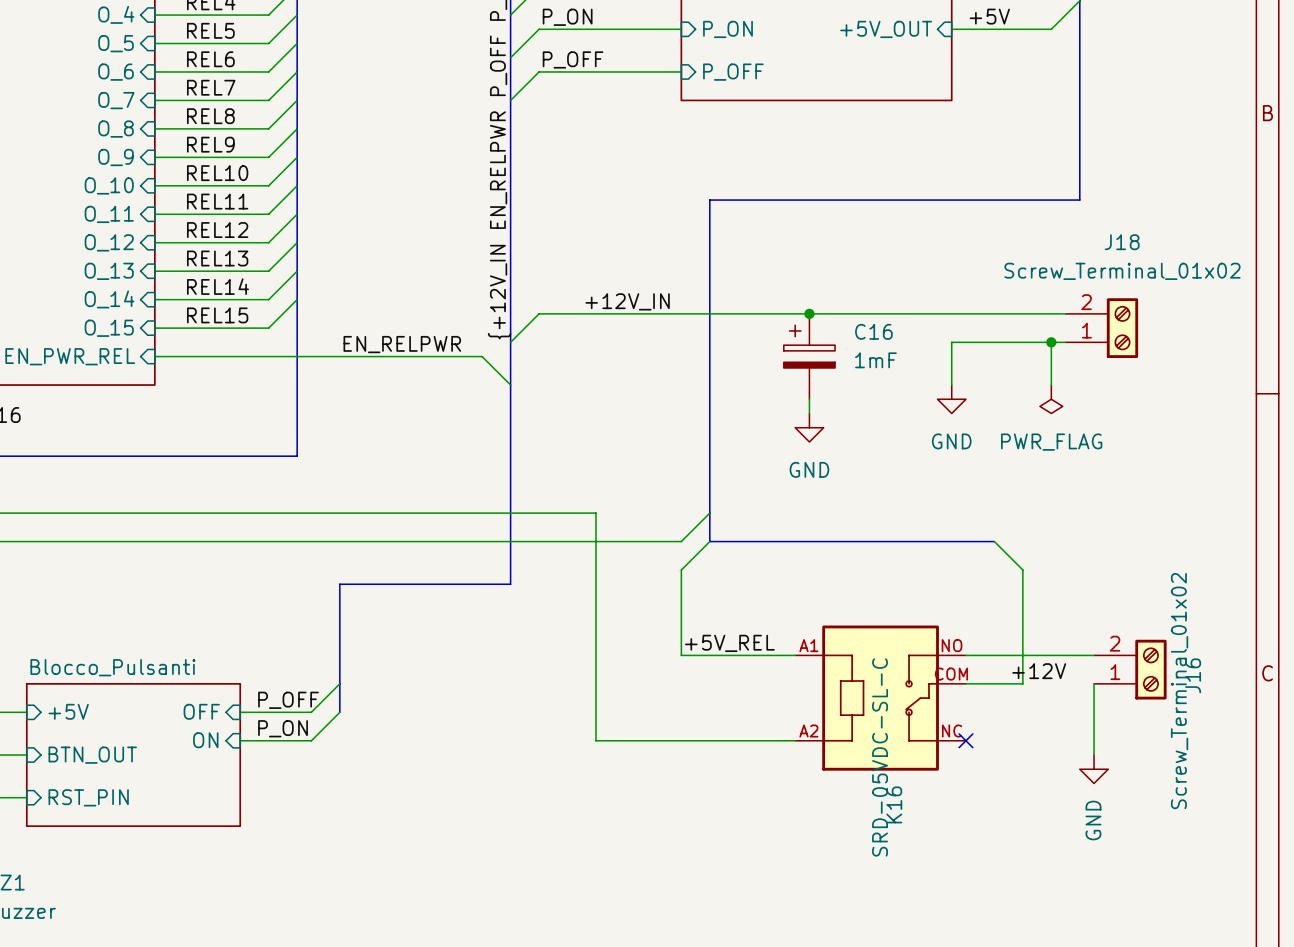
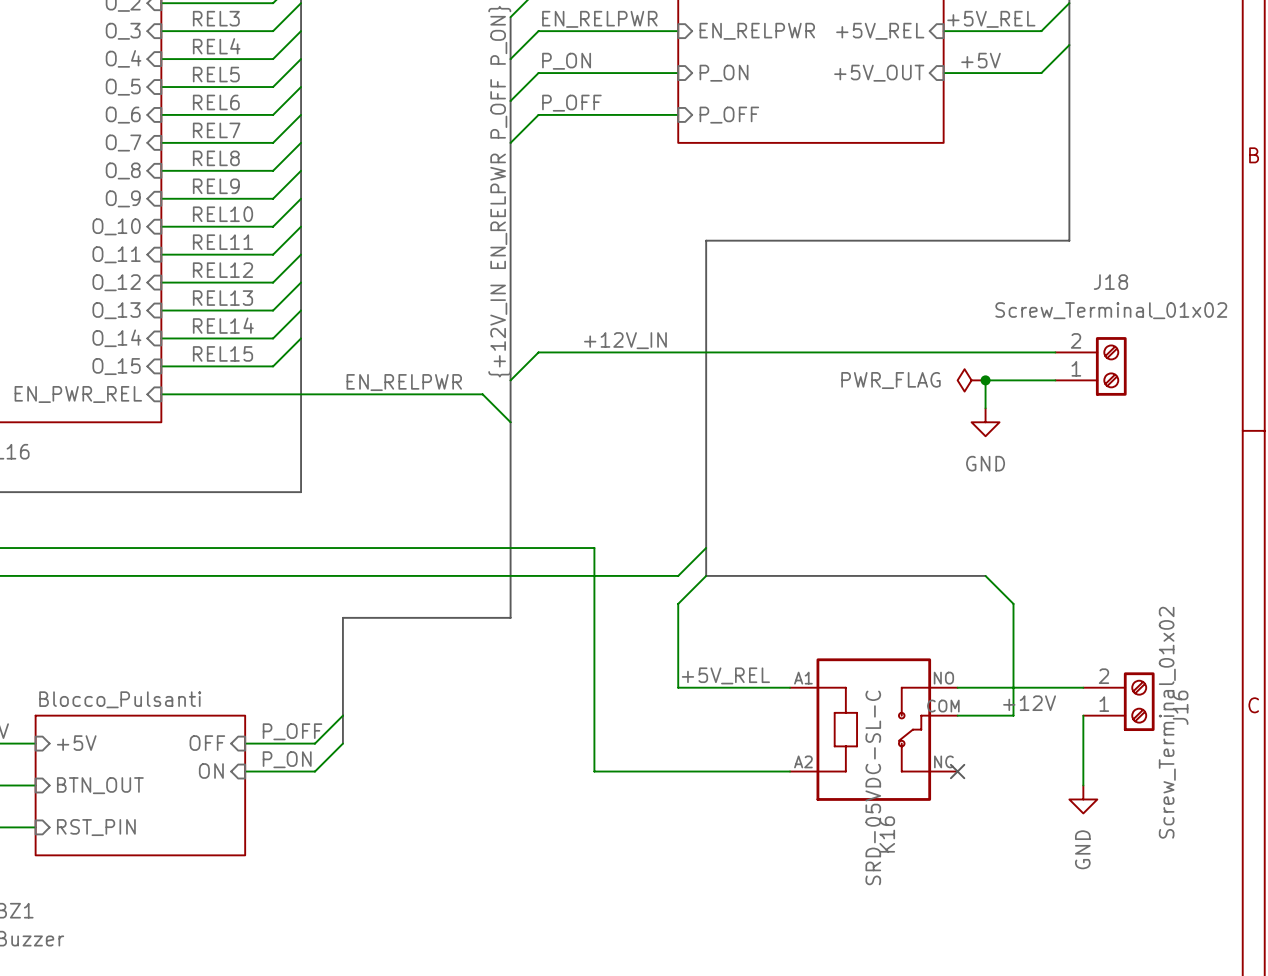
junction: (809, 313) -> none
wire: (994, 342) (951, 342) (951, 385) -> (985, 380) (985, 408)
wire: (1051, 342) (1051, 385) -> none
junction position: (1051, 342) -> (985, 380)
C16: 1mF (809, 356) -> none
wire: (809, 399) (809, 413) -> none
power symbol position: GND (951, 399) -> GND (985, 422)
power symbol rotation: 0° (1051, 399) -> 90° clockwise (971, 380)
power symbol position: PWR_FLAG (1051, 399) -> PWR_FLAG (971, 380)
power symbol: GND (809, 427) -> none
power symbol text position: PWR_FLAG (1051, 442) -> PWR_FLAG (890, 380)

